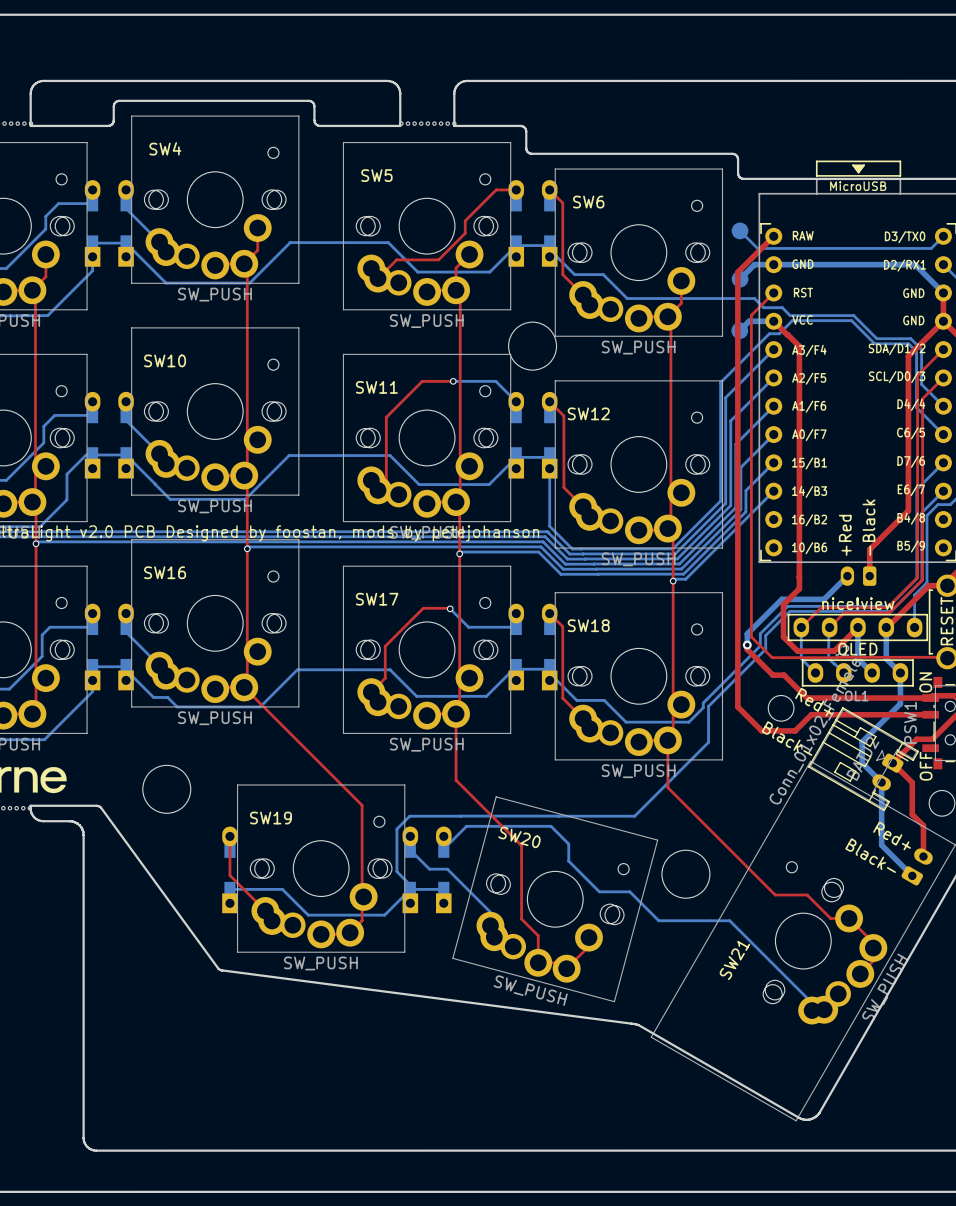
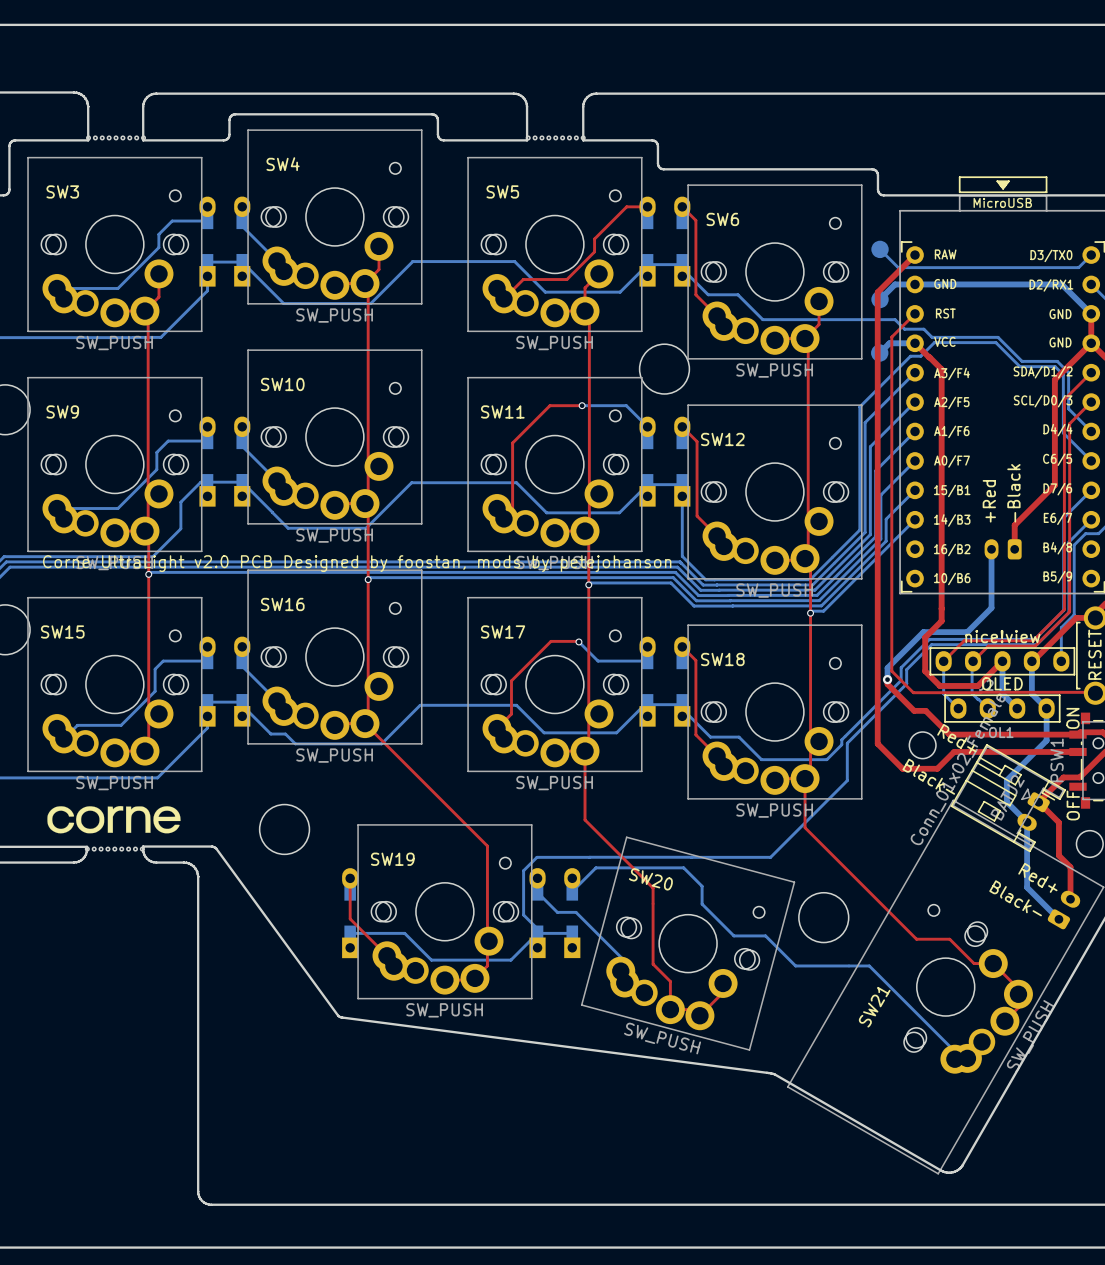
top track: (908, 457) (908, 510) (876, 542) -> (1054, 485) (1014, 525) (1014, 549)
bottom track: none -> (991, 549) (991, 608)
text position: -Black (868, 527) -> -Black (1013, 493)
text position: +Red (845, 535) -> +Red (989, 501)
top track: (876, 542) (869, 549) (869, 576) -> none
part position: (858, 576) -> (1003, 549)

